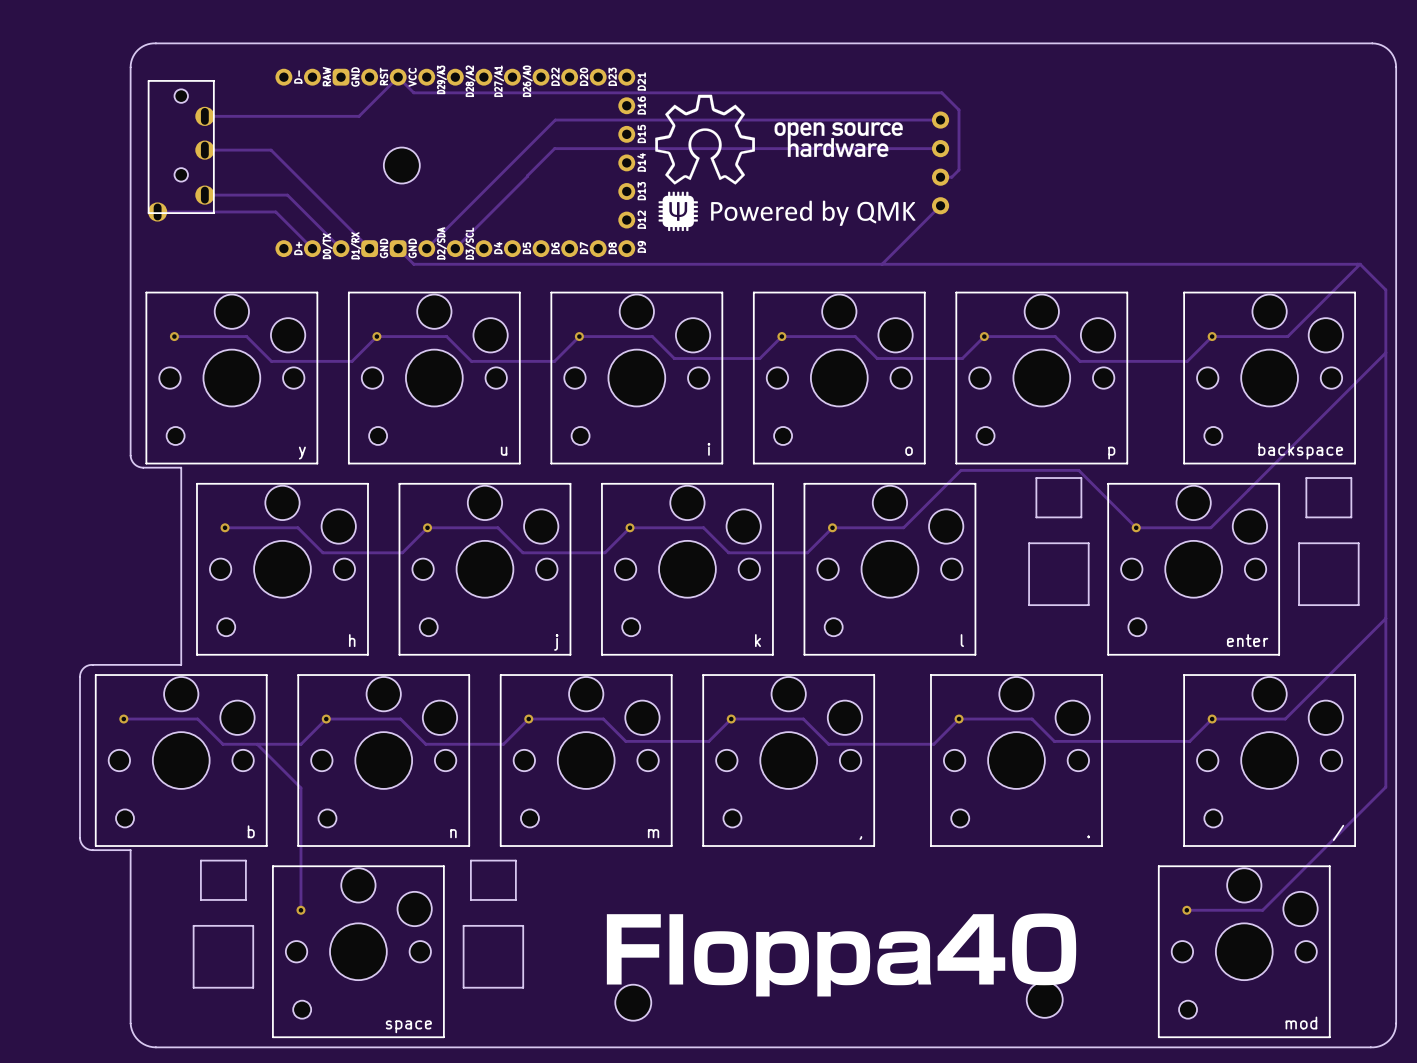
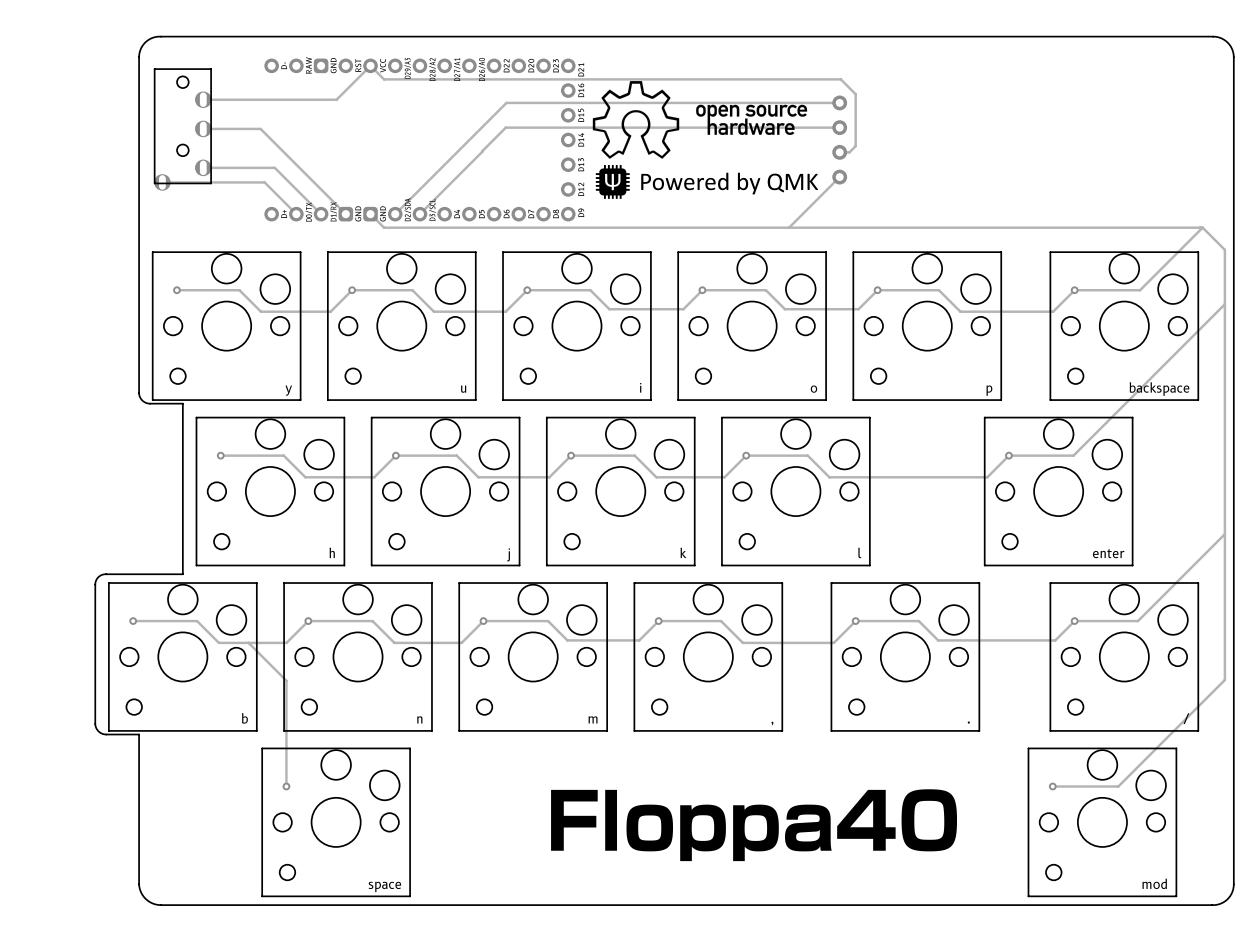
part: (401, 165) -> none
drawing: [1028, 477, 1360, 606] -> none
track: (903, 527) (961, 470) (1078, 470) (1136, 527) -> (807, 455) (829, 477) (987, 477) (1008, 455)
drawing: [192, 859, 524, 989] -> none
part: (1044, 999) -> none
part: (633, 1002) -> none

